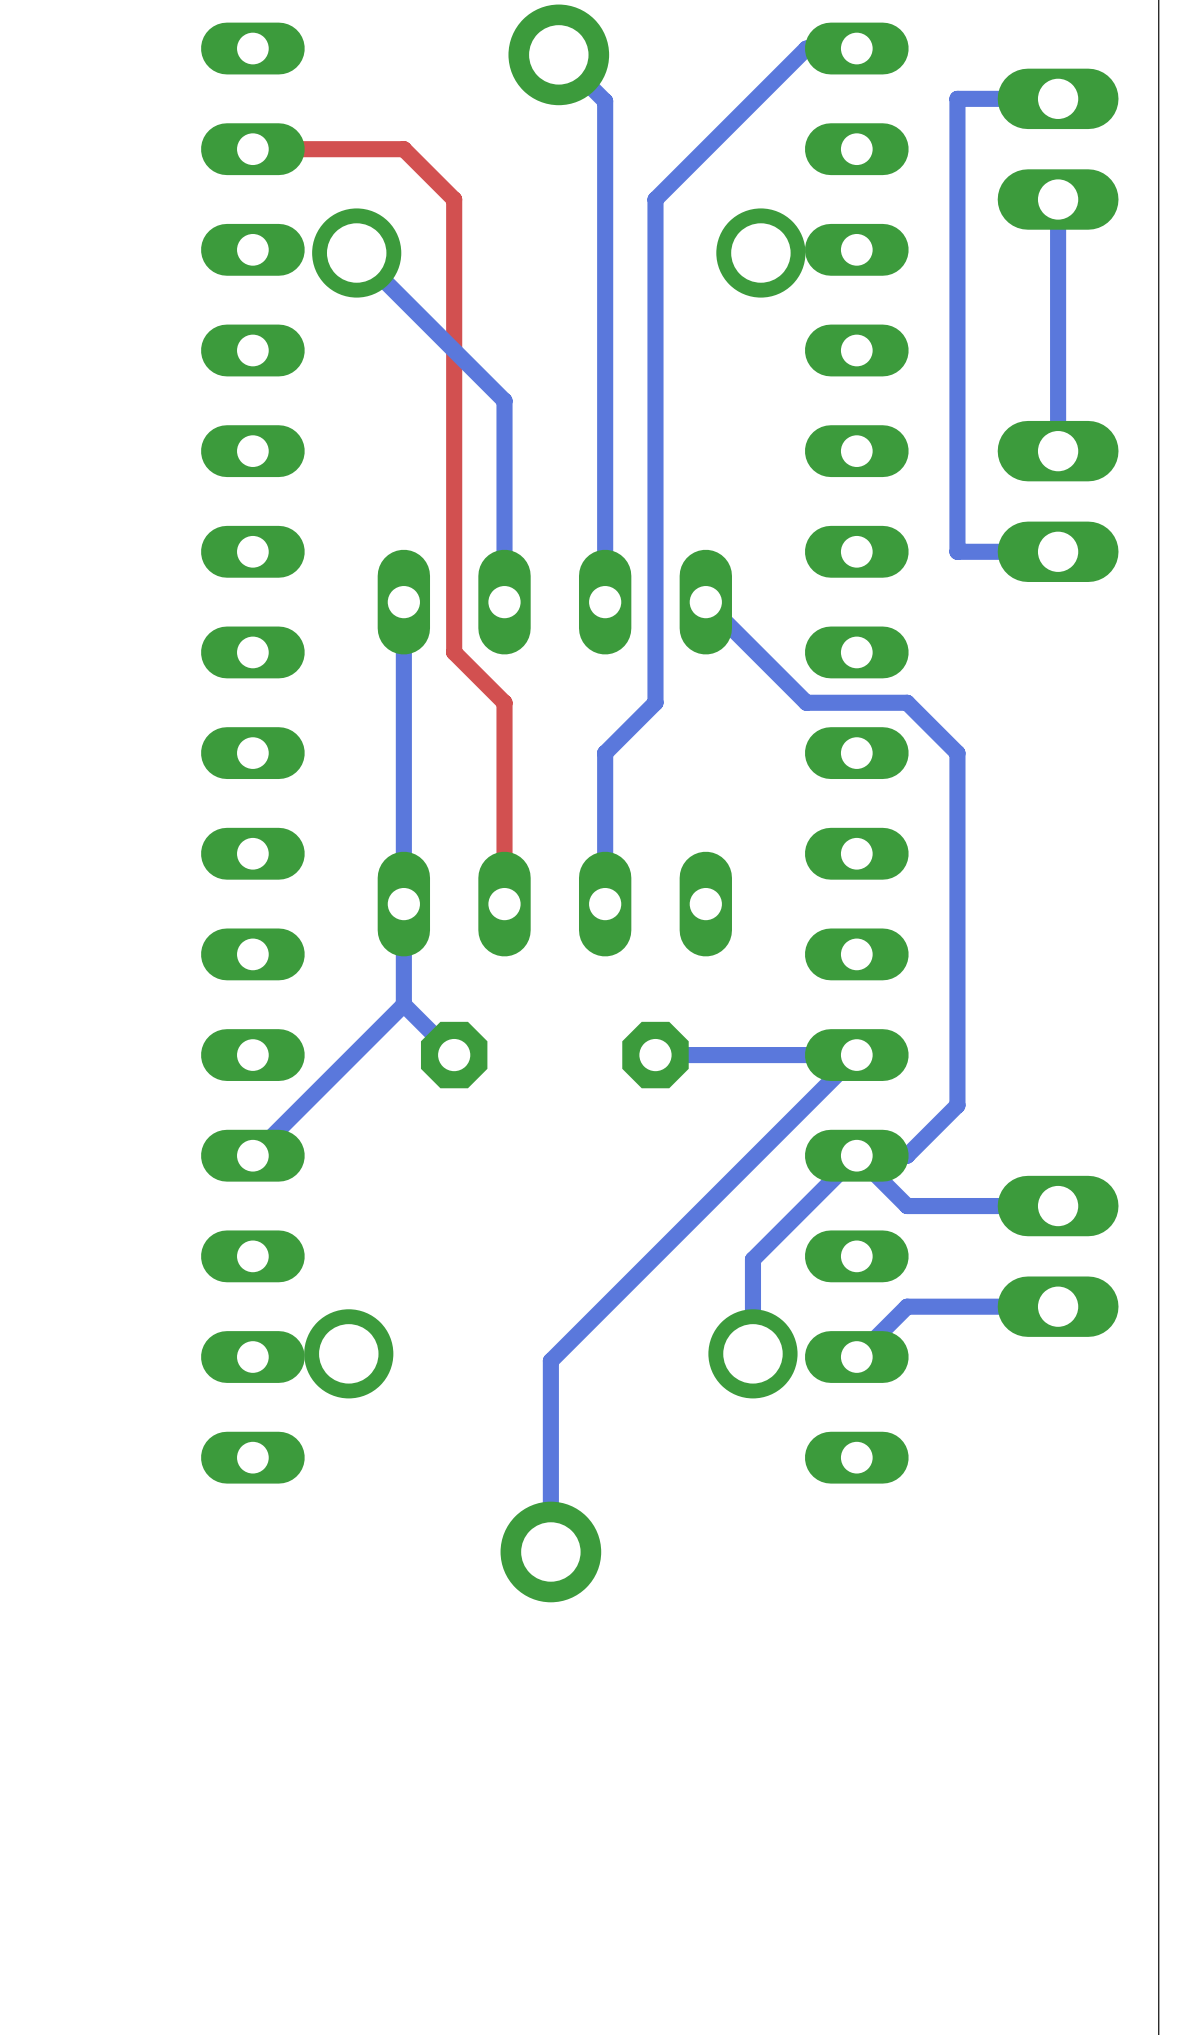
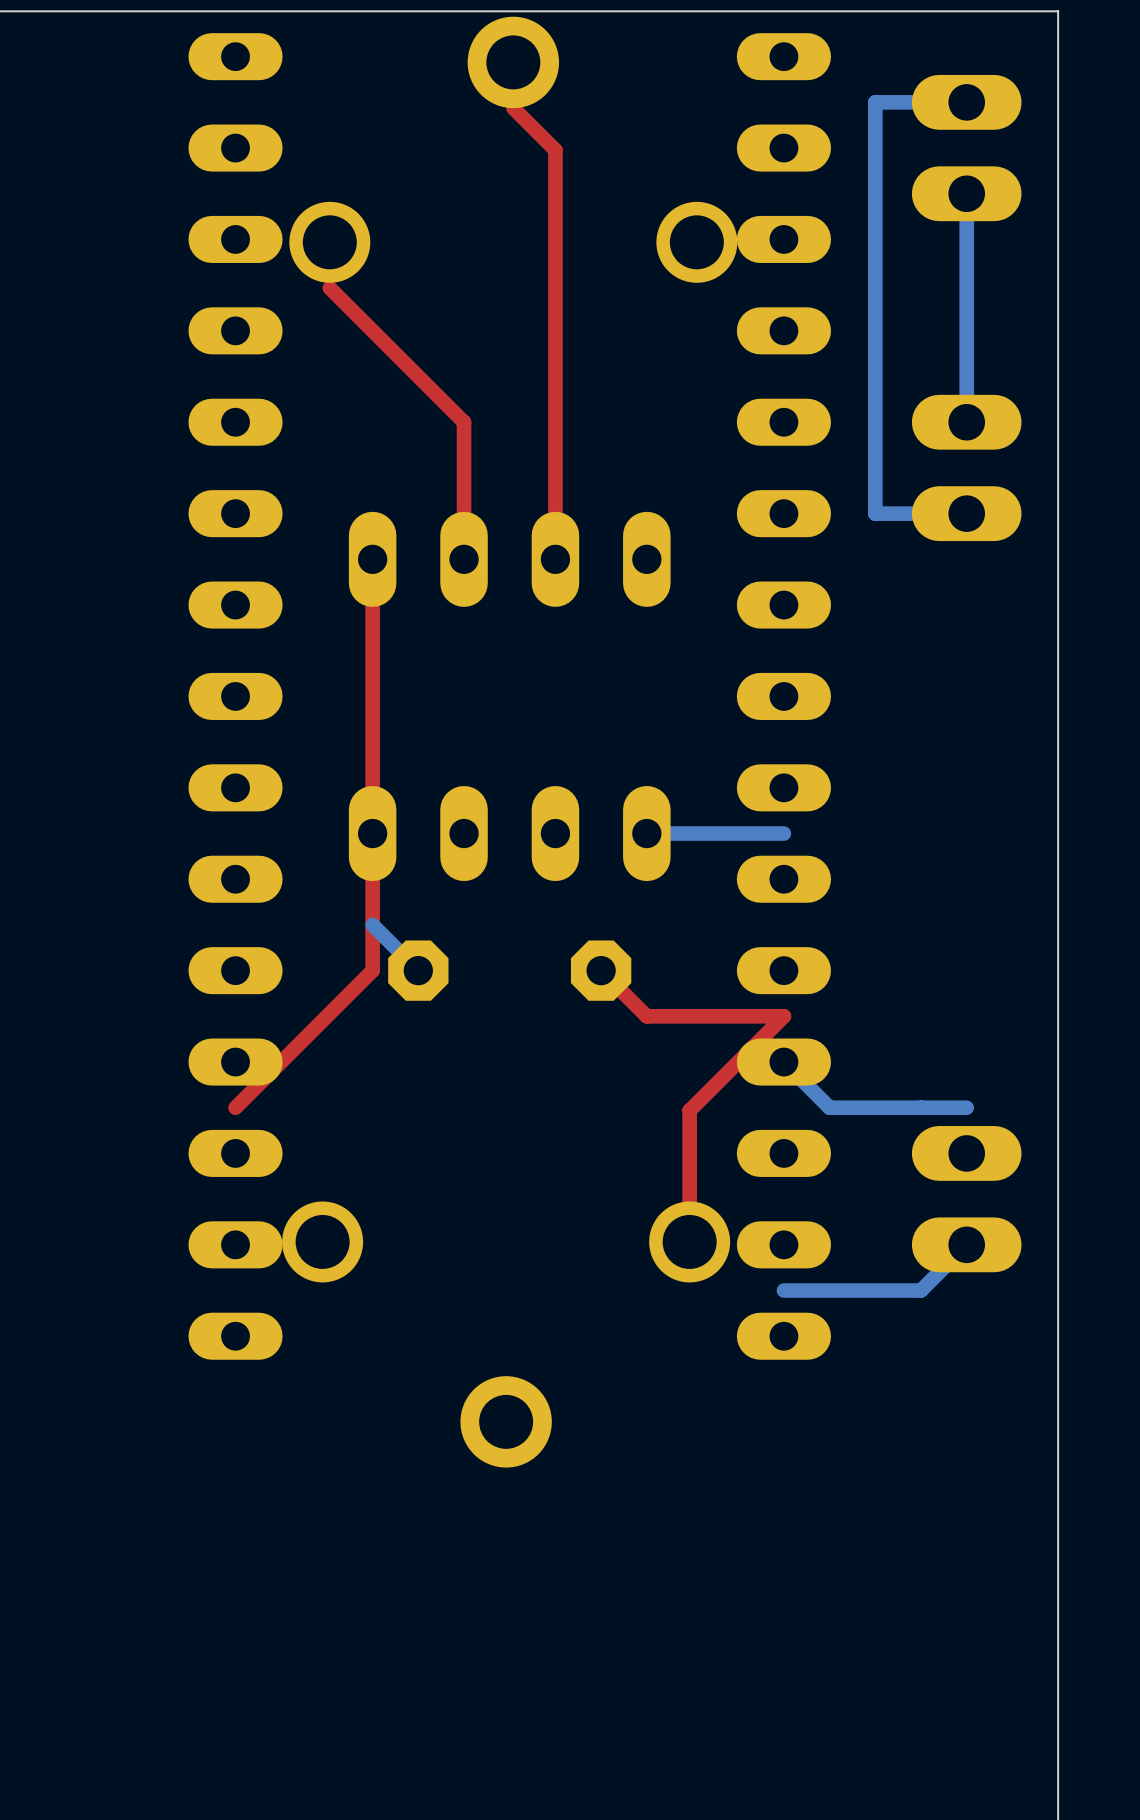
bottom track: (856, 48) (806, 48) (655, 199) (655, 702) (605, 753) (605, 904) -> none
bottom track: (558, 54) (605, 101) (605, 602) -> none
top track: none -> (513, 108) (555, 150) (555, 559)
top track: (252, 149) (403, 149) (454, 199) (454, 652) (504, 702) (504, 904) -> none
bottom track: (356, 253) (504, 400) (504, 602) -> none
top track: none -> (329, 288) (464, 422) (464, 559)
bottom track: (403, 602) (403, 1004) (252, 1155) -> none
top track: none -> (372, 559) (372, 970) (235, 1107)
bottom track: (705, 602) (806, 702) (907, 702) (957, 753) (957, 1105) (907, 1155) (856, 1155) (752, 1259) (752, 1353) -> none
bottom track: none -> (783, 833) (646, 833)
bottom track: (655, 1055) (856, 1055) (550, 1360) (550, 1551) -> none
top track: none -> (601, 970) (646, 1016) (783, 1016) (689, 1110) (689, 1241)
part position: (1058, 1256) -> (966, 1199)
bottom track: (1058, 1306) (907, 1306) (856, 1357) -> none
bottom track: none -> (966, 1244) (921, 1290) (783, 1290)

